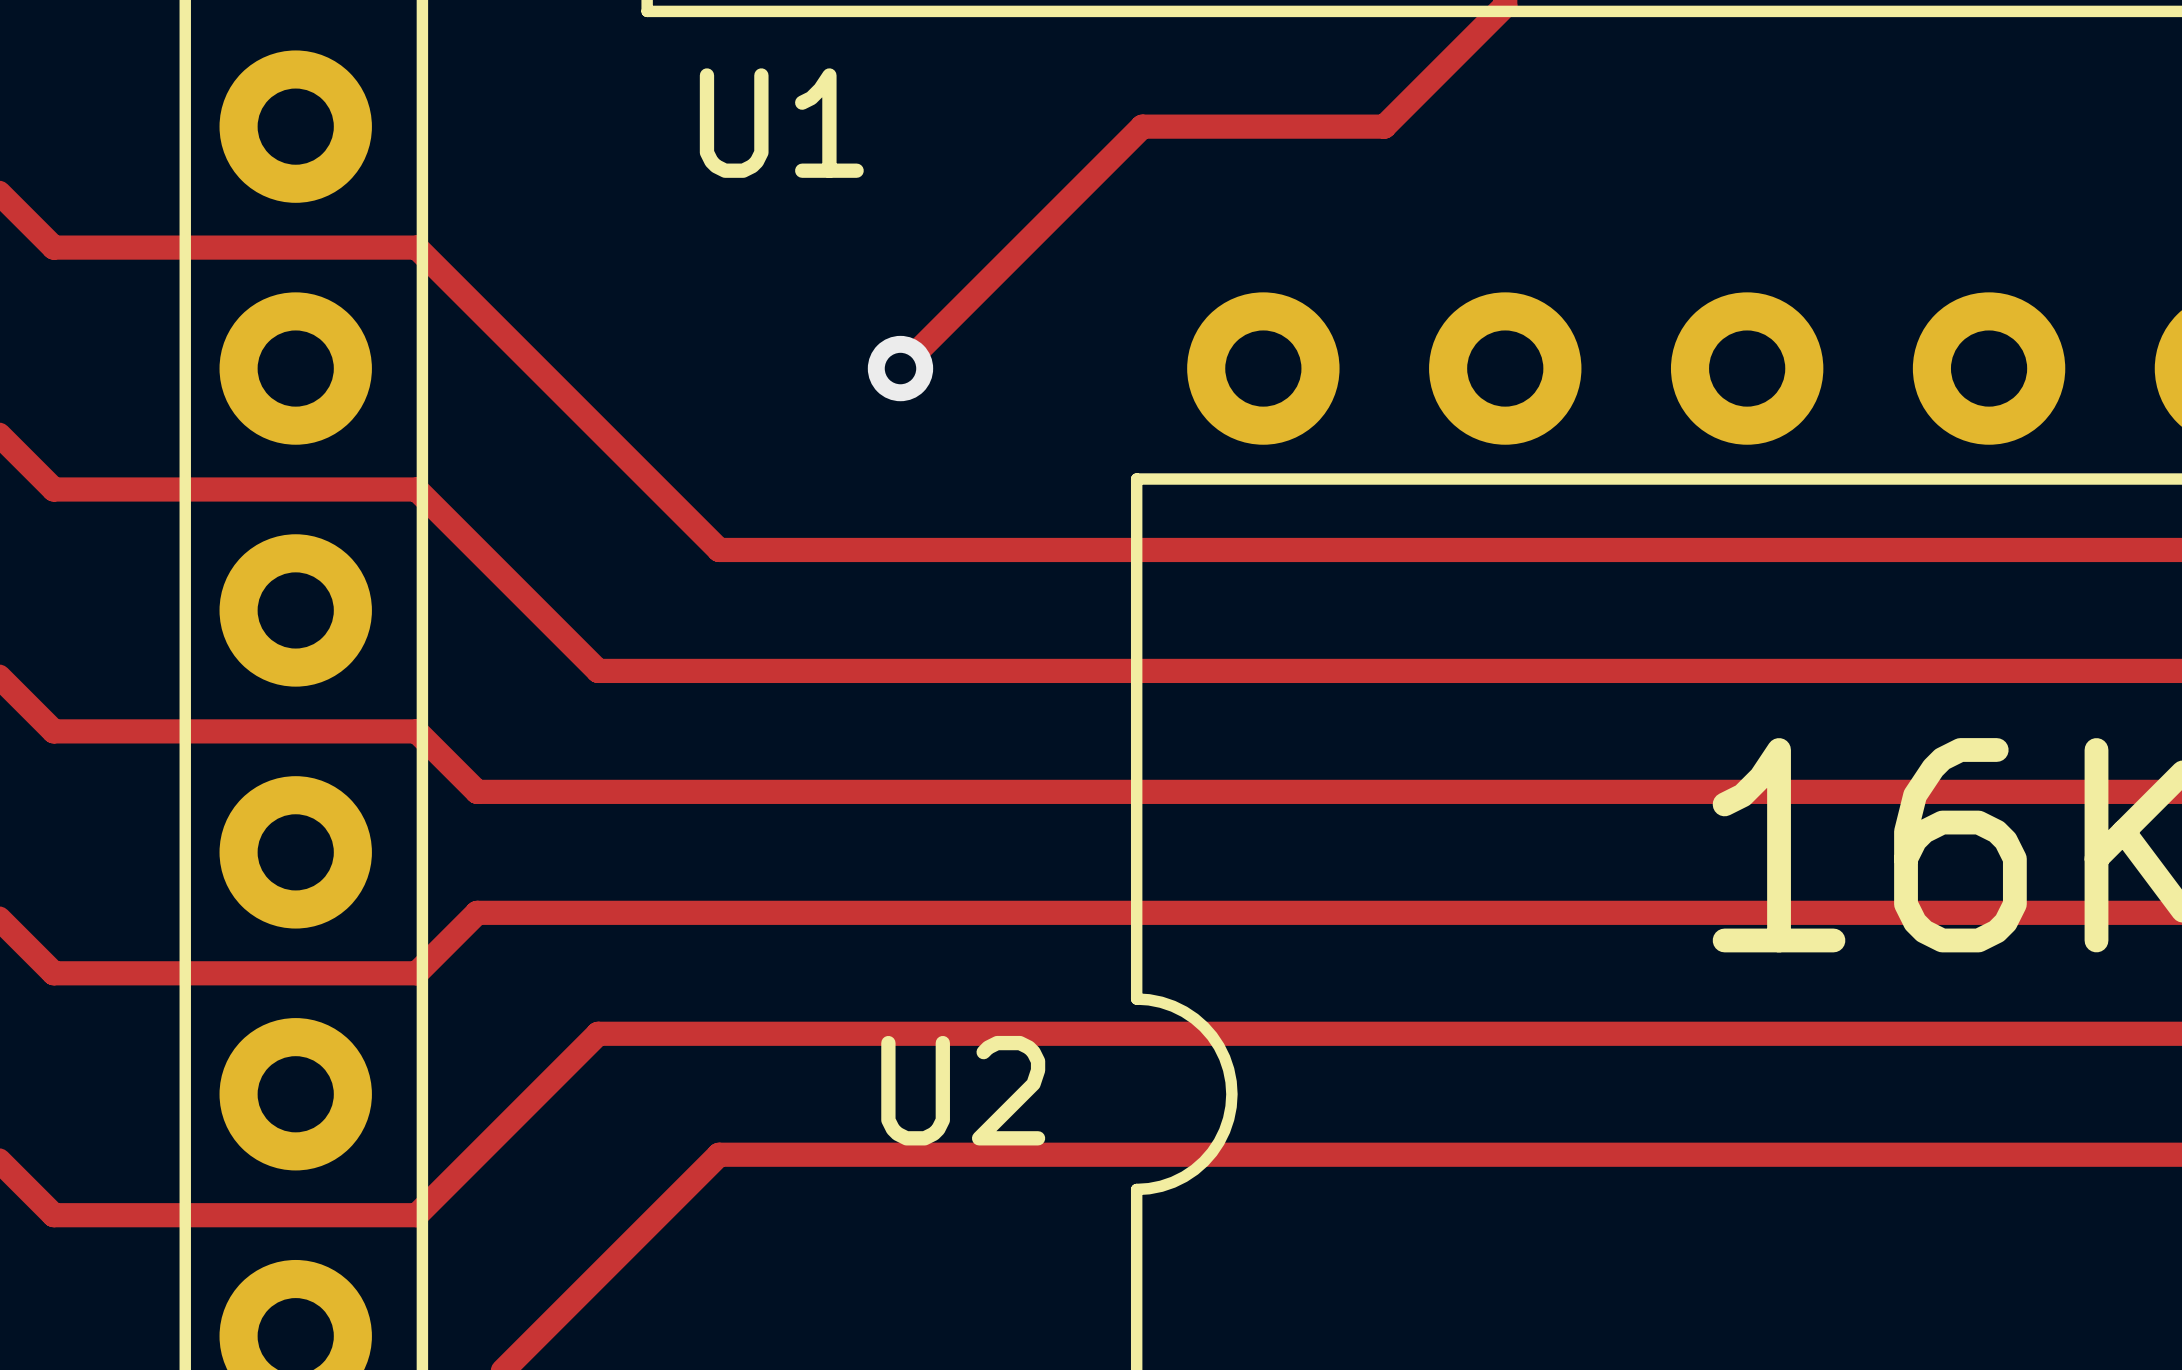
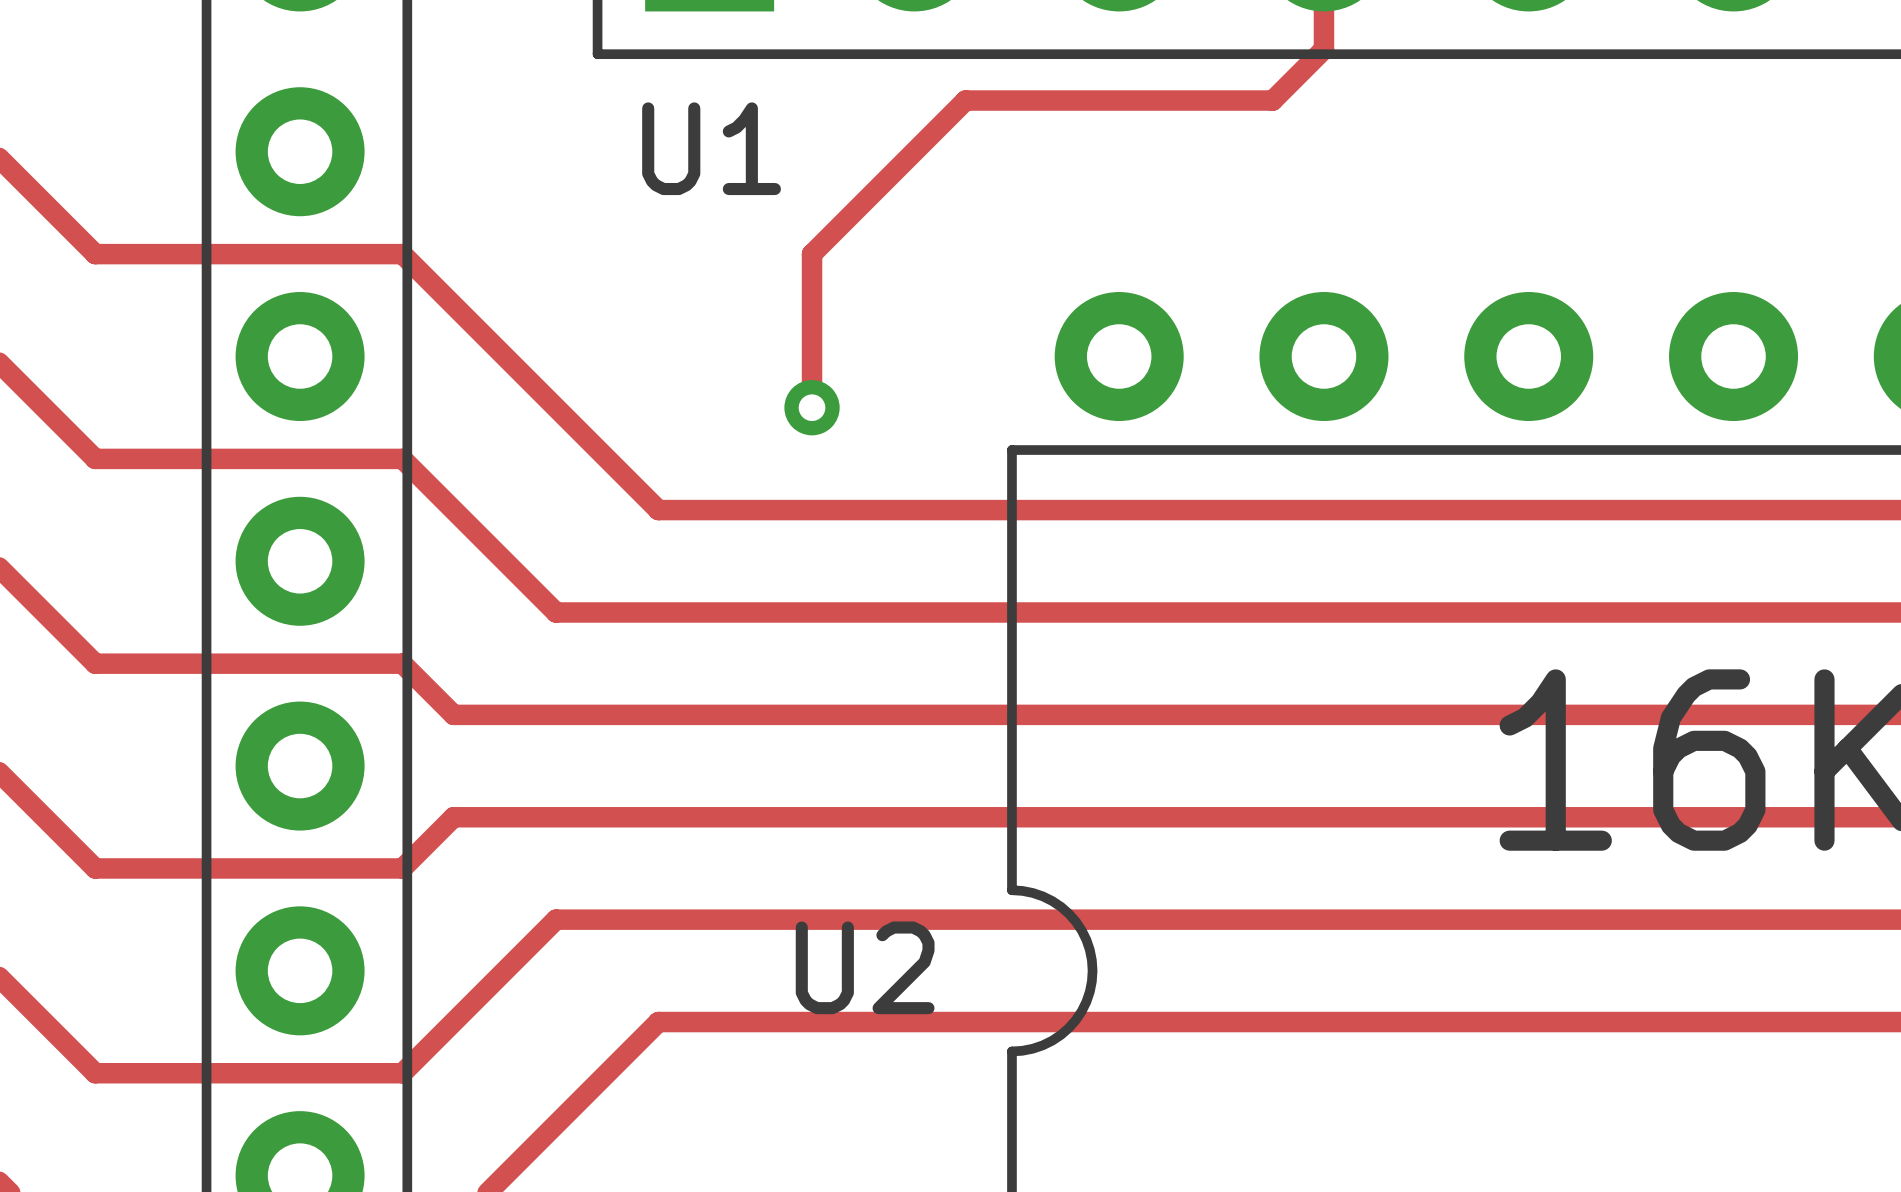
track: (1444, 66) (1384, 126) (1142, 126) (900, 368) -> (1272, 100) (965, 100) (812, 254) (812, 407)
via position: (900, 368) -> (812, 407)

